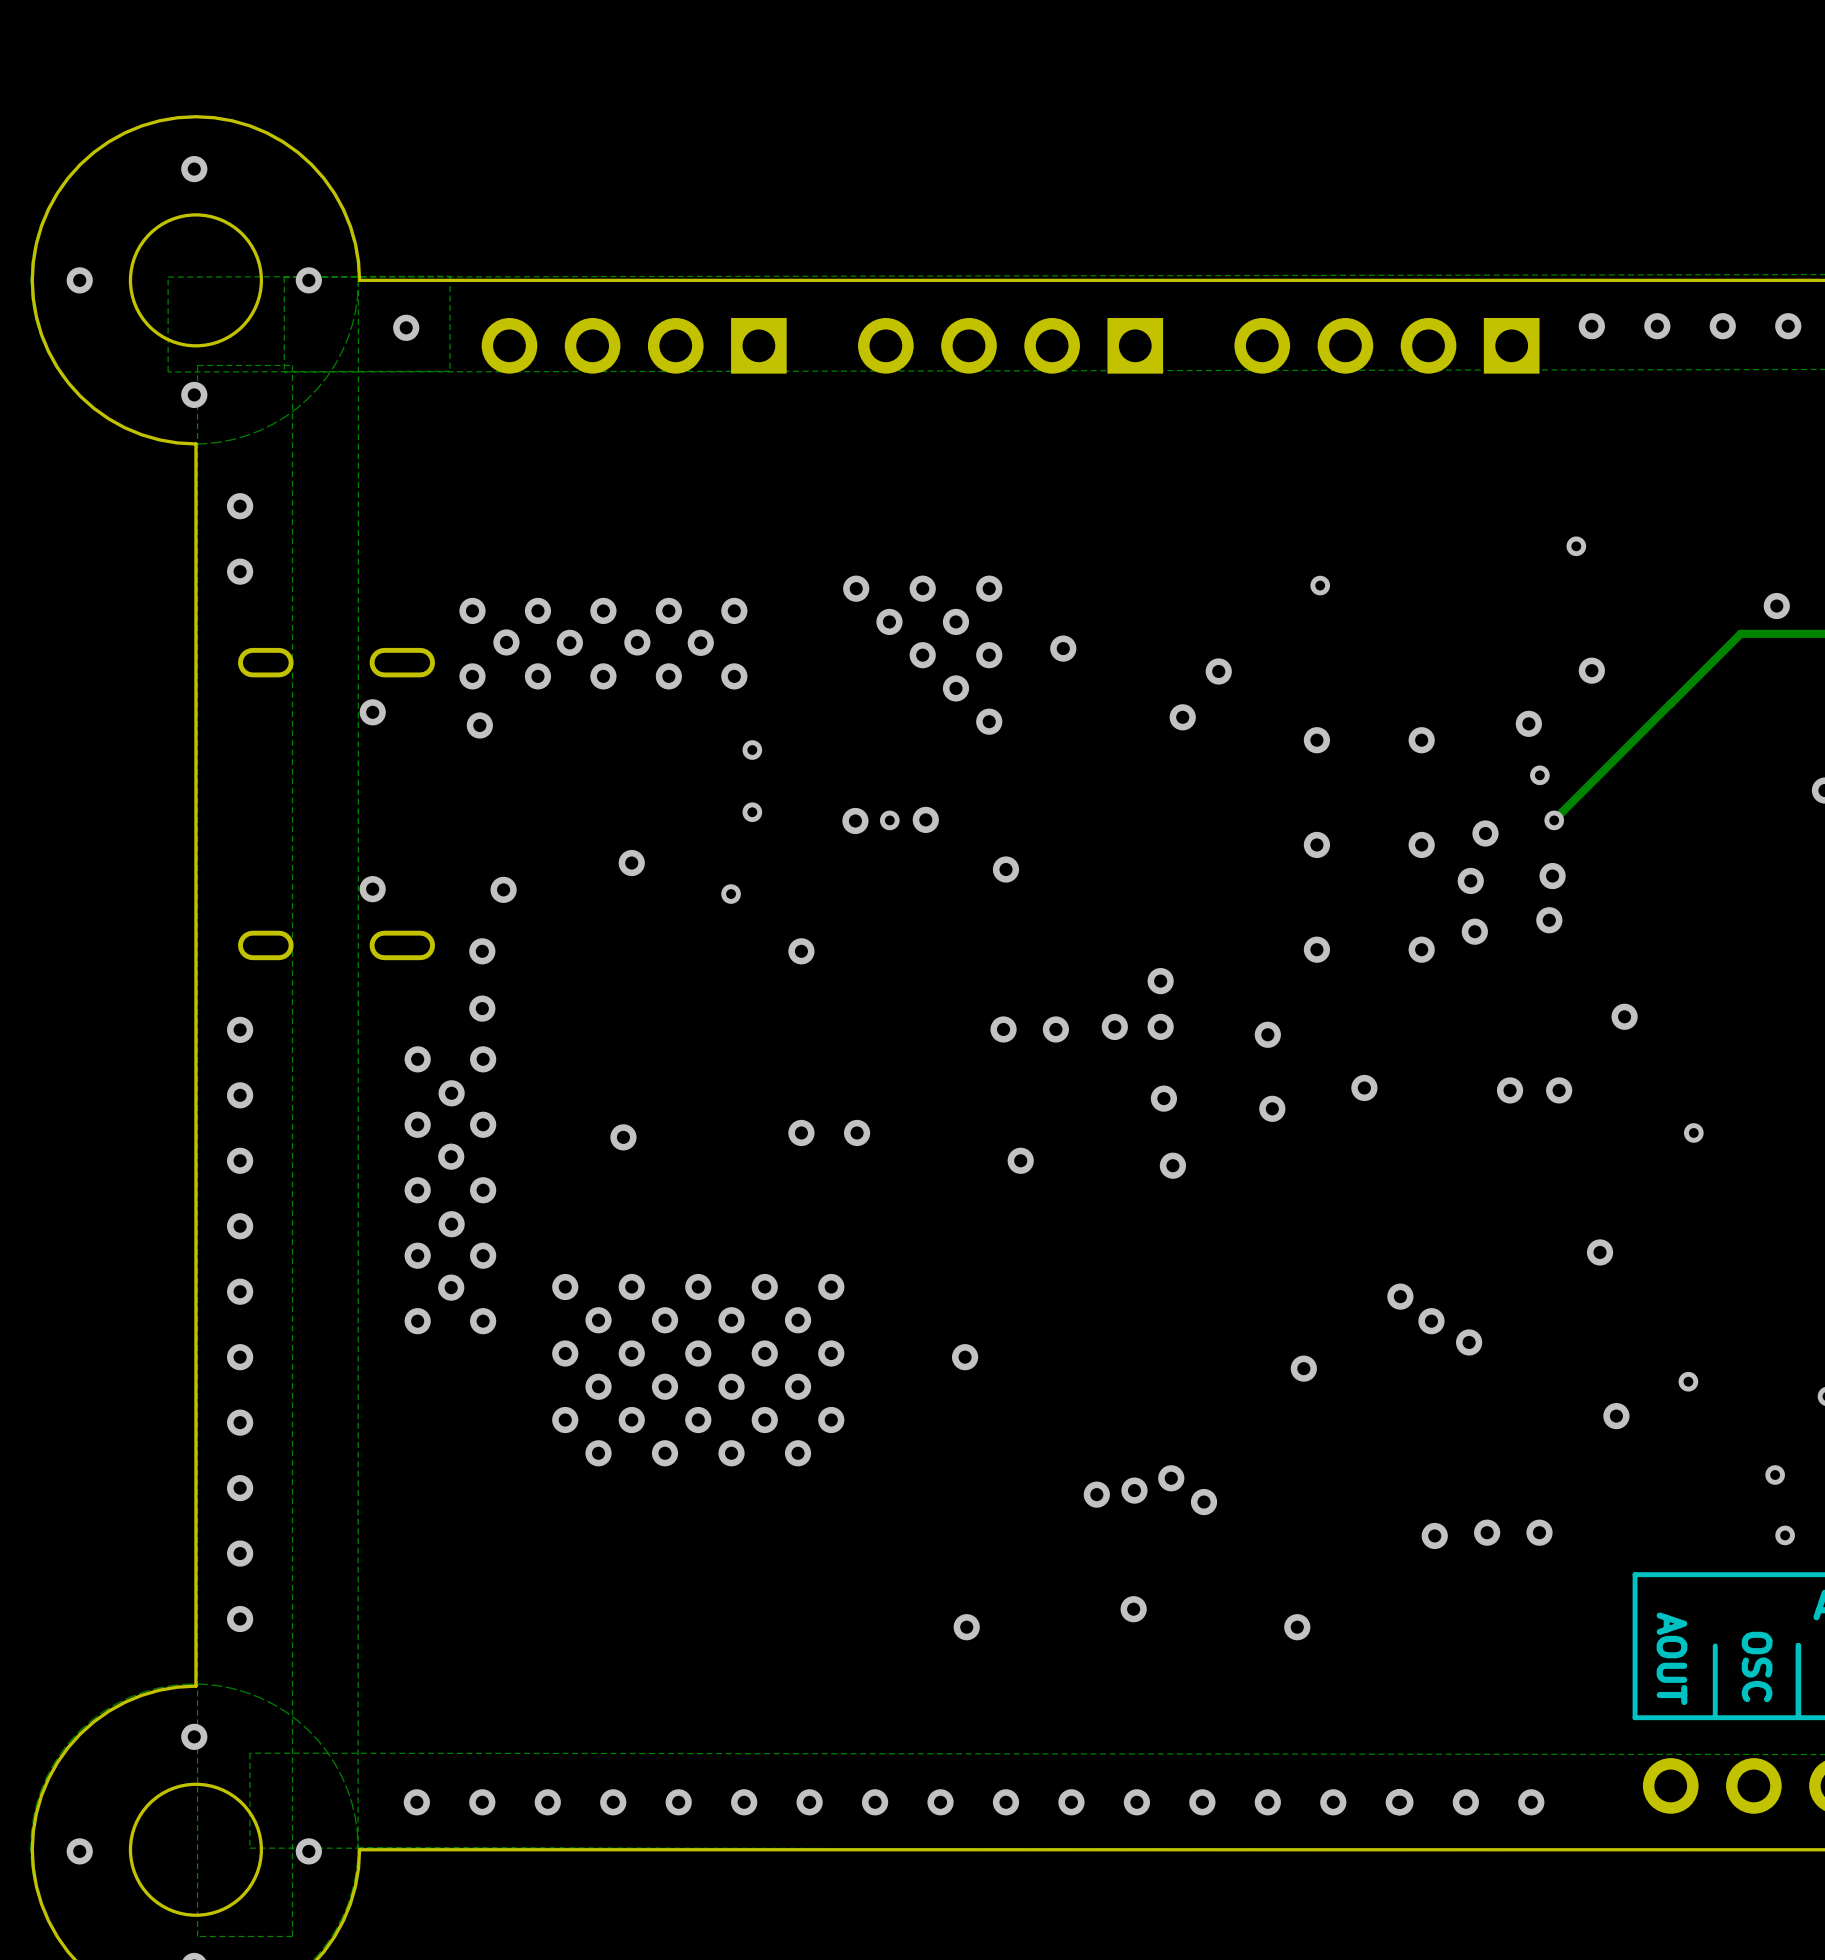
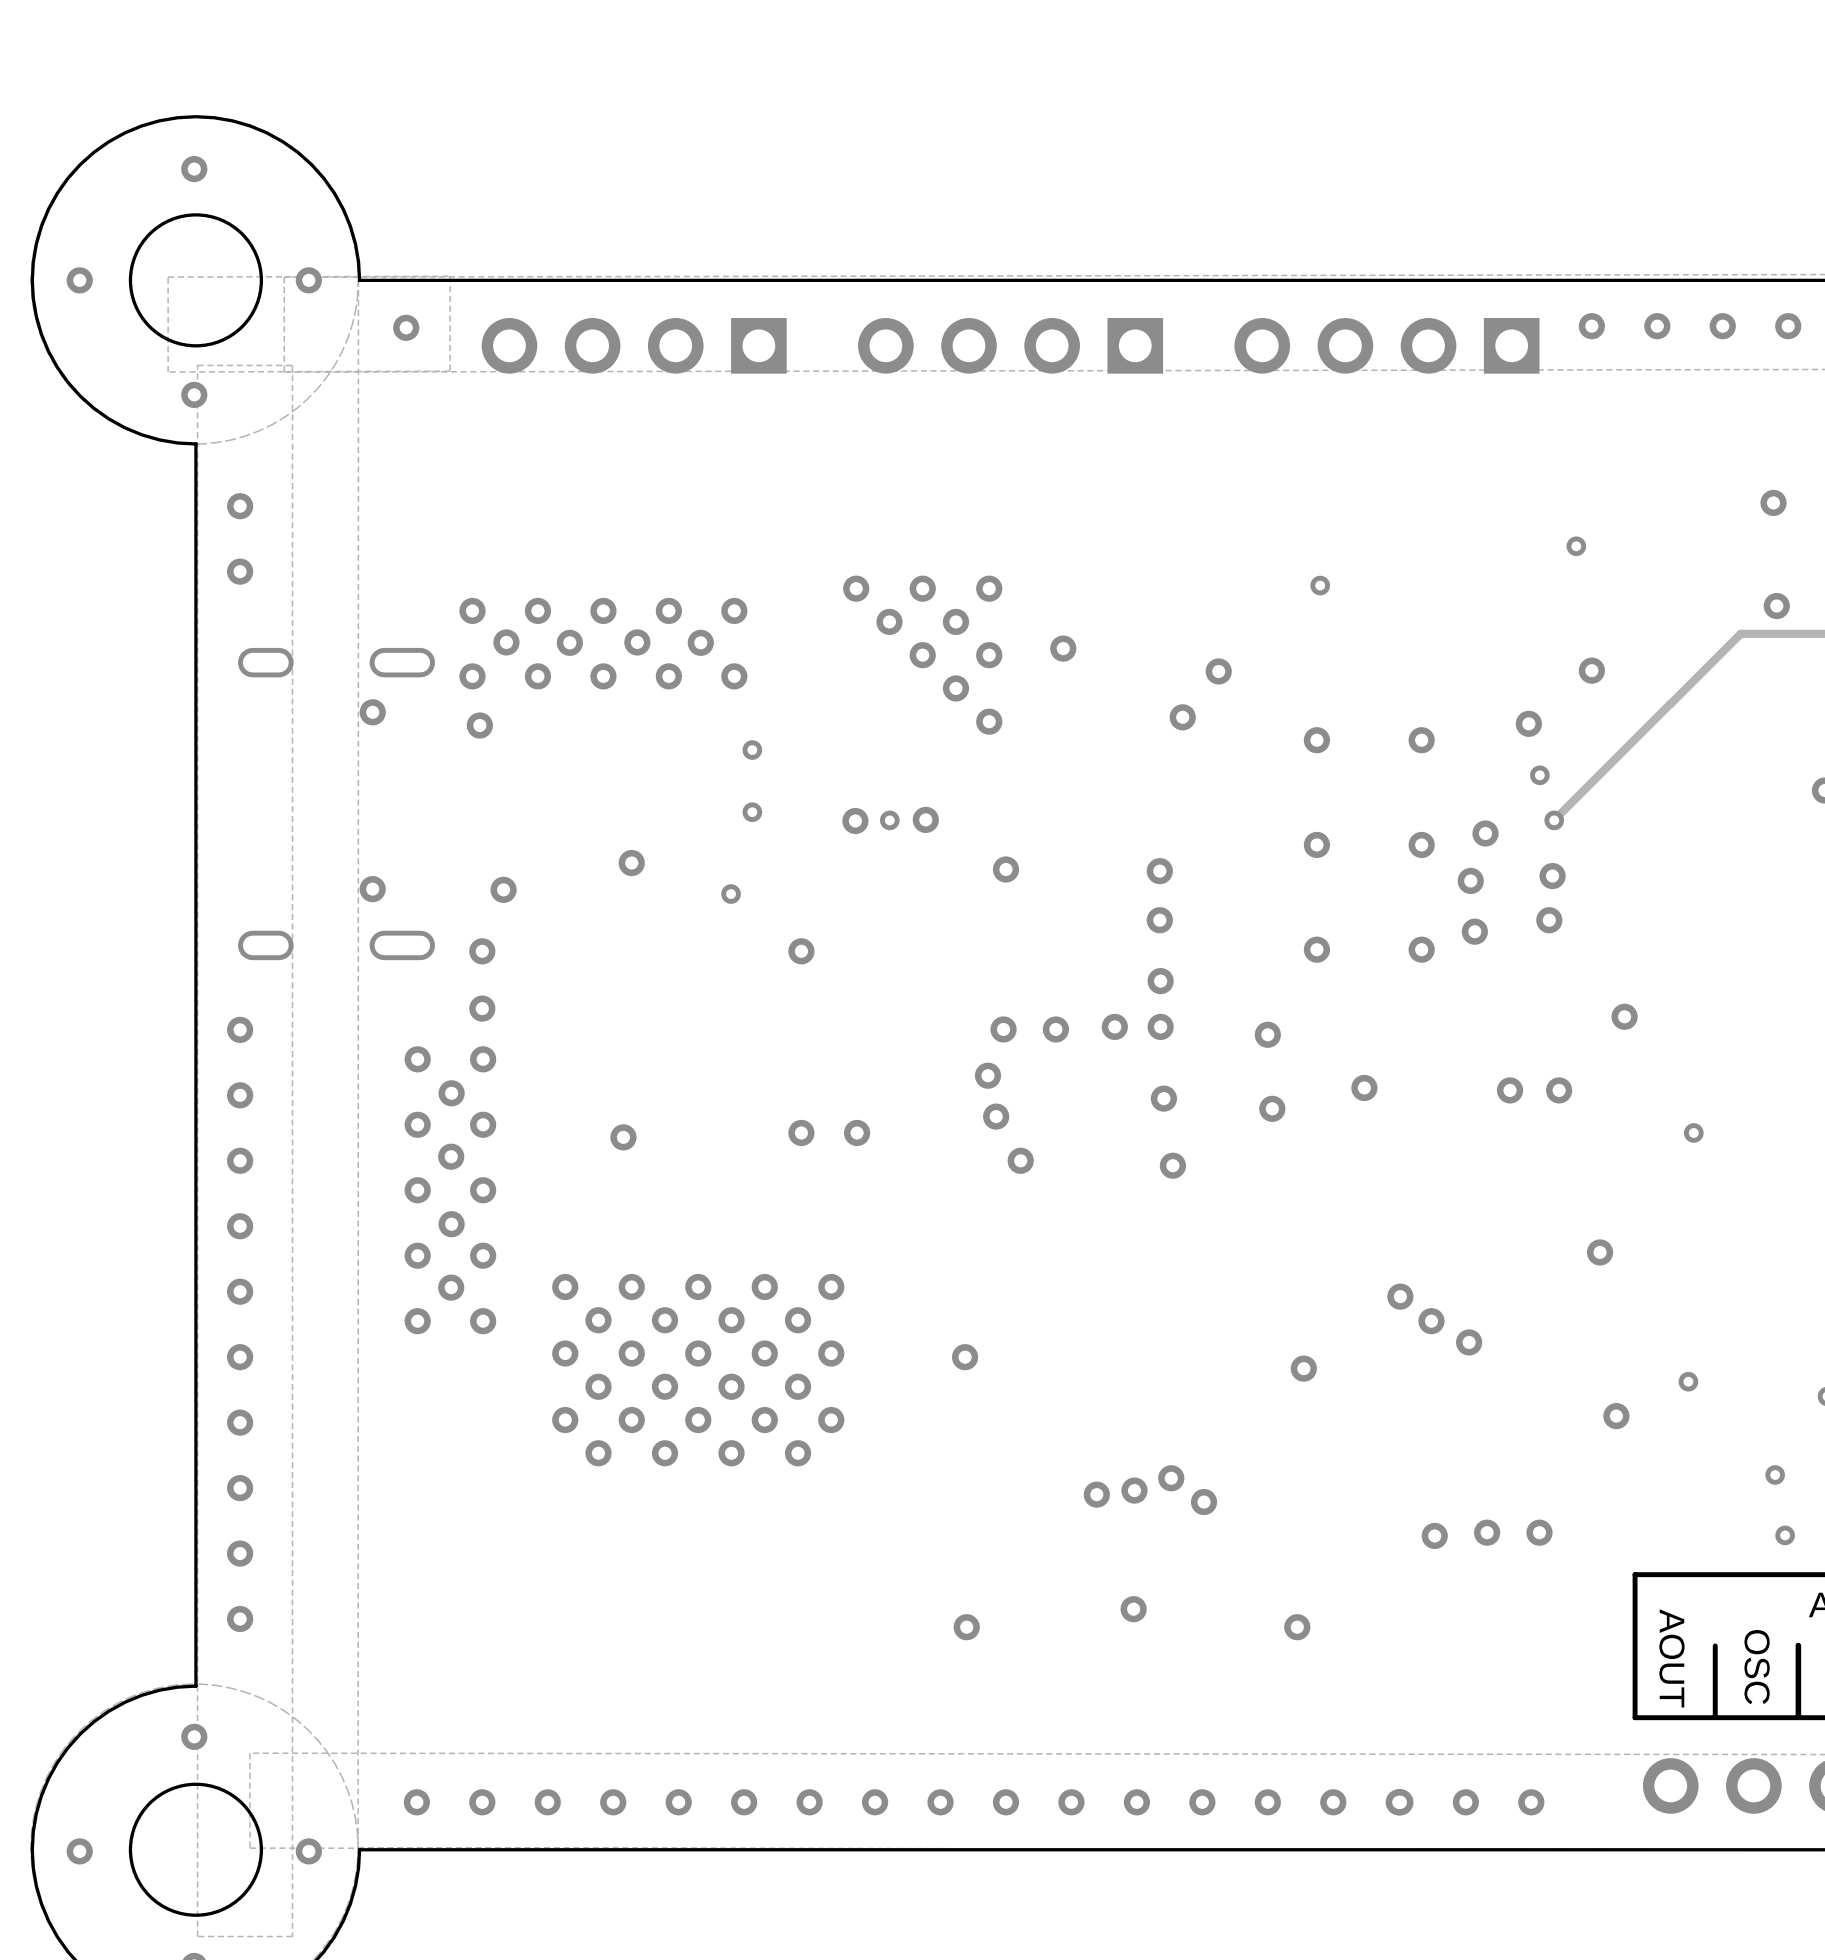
via: none -> (1773, 502)
via: none -> (1159, 871)
via: none -> (1159, 920)
via: none -> (987, 1075)
via: none -> (996, 1116)

